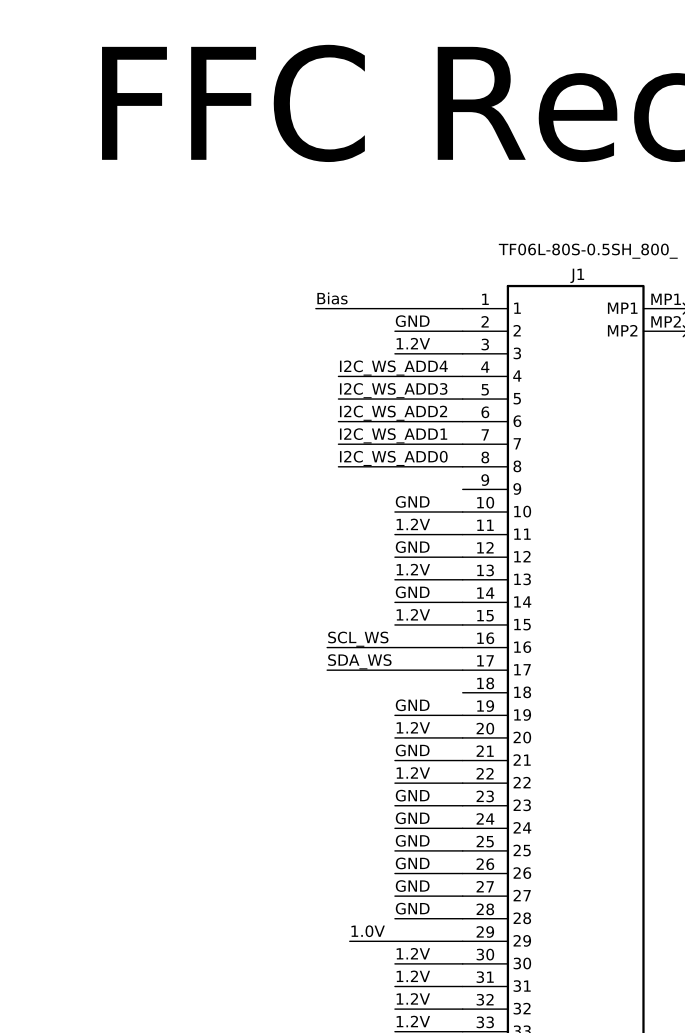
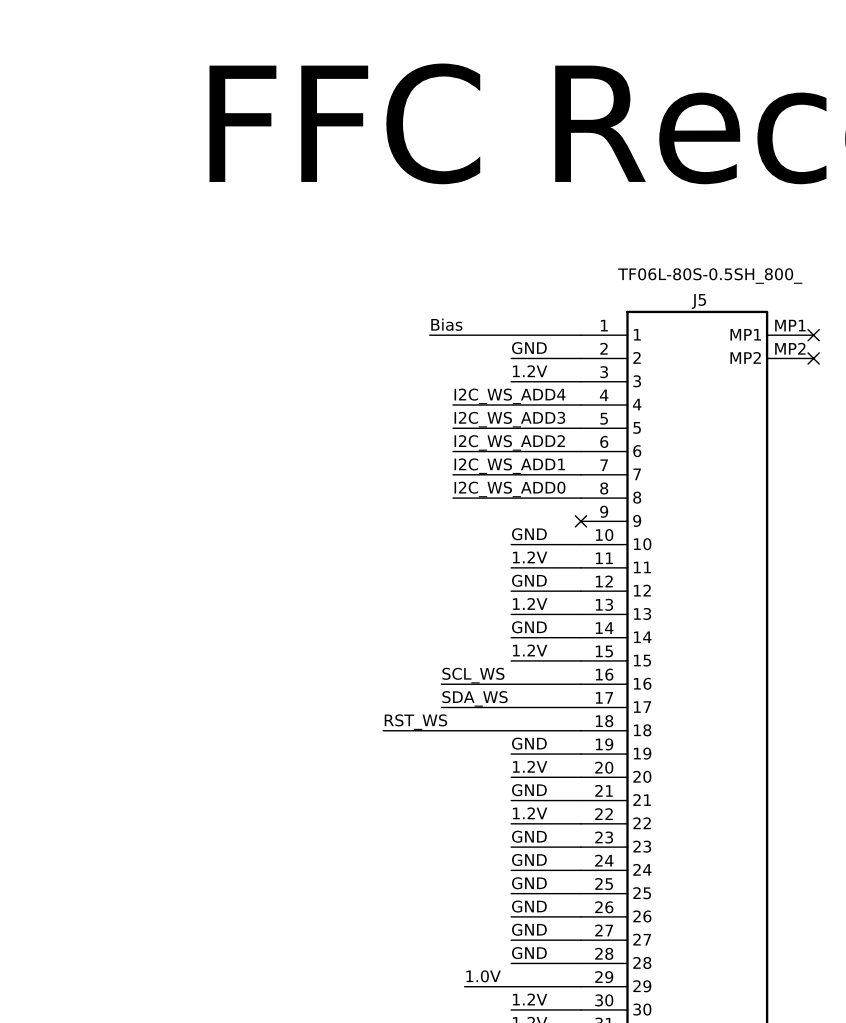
J1 name: J1 (577, 275) -> J5 (698, 301)
no-connect mark: none -> (580, 521)
label: none -> RST_WS (415, 722)
wire: none -> (383, 730) (580, 730)

